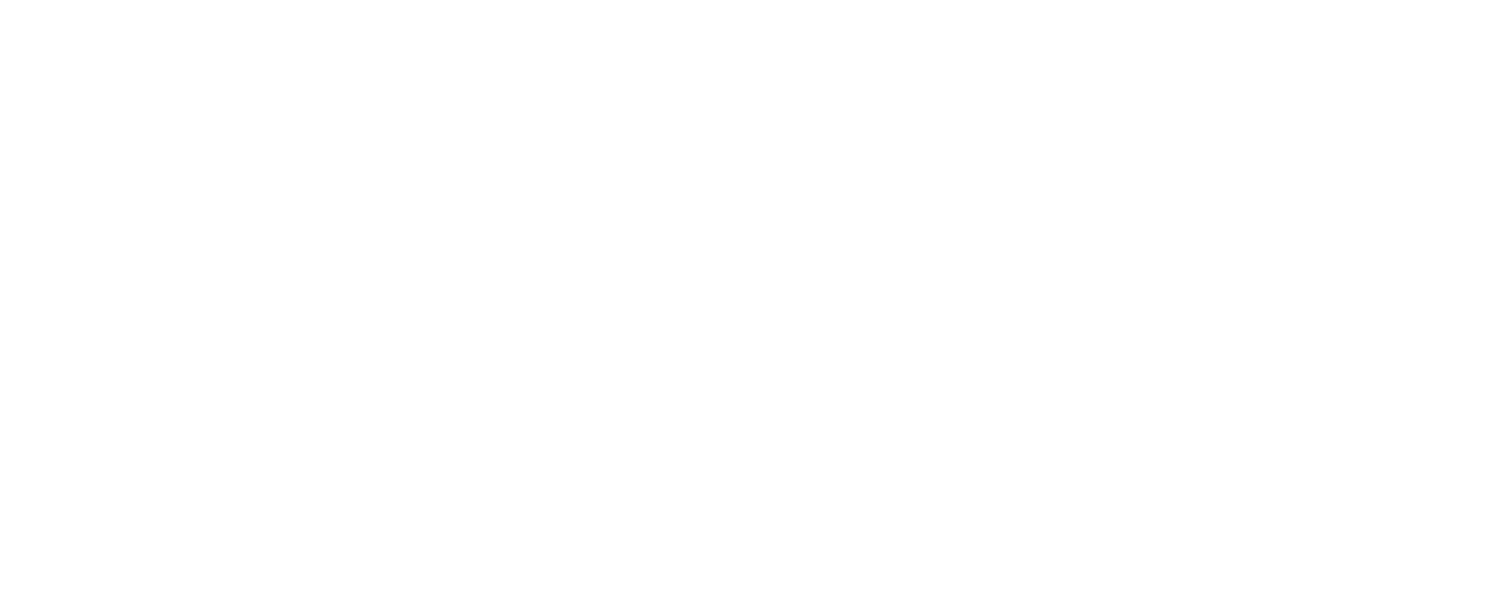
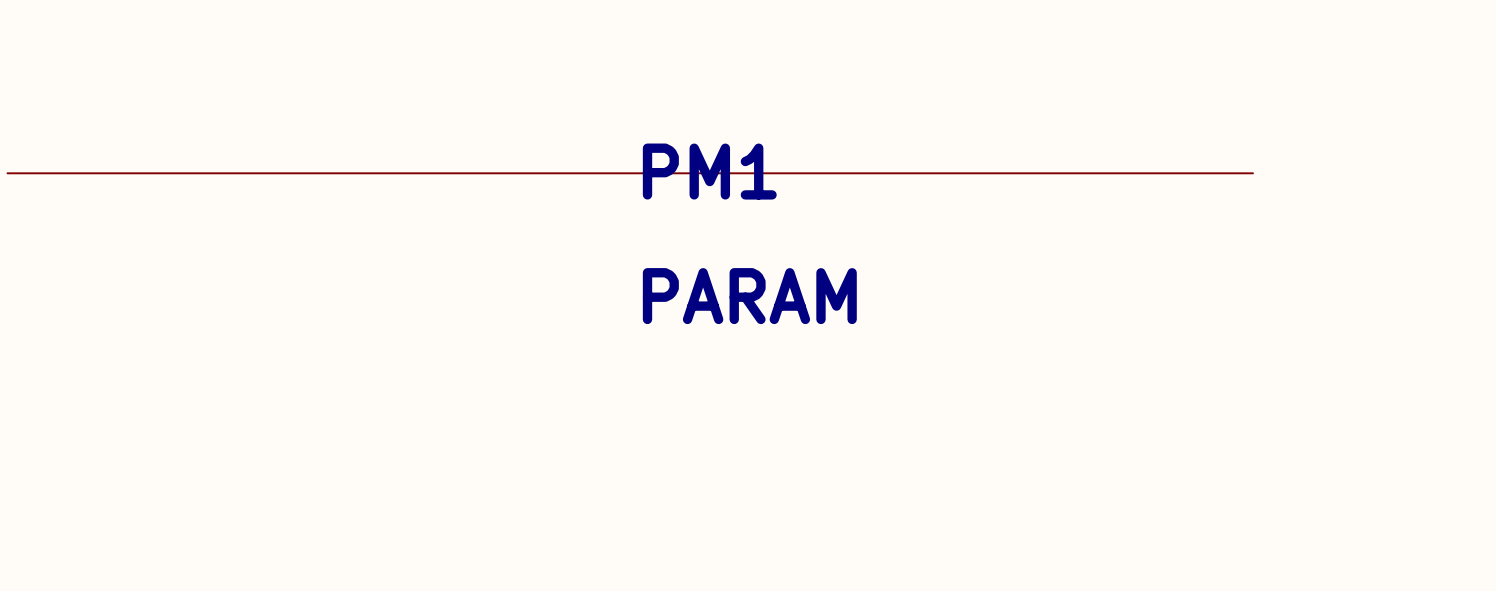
PM1: none -> PARAM (630, 173)

